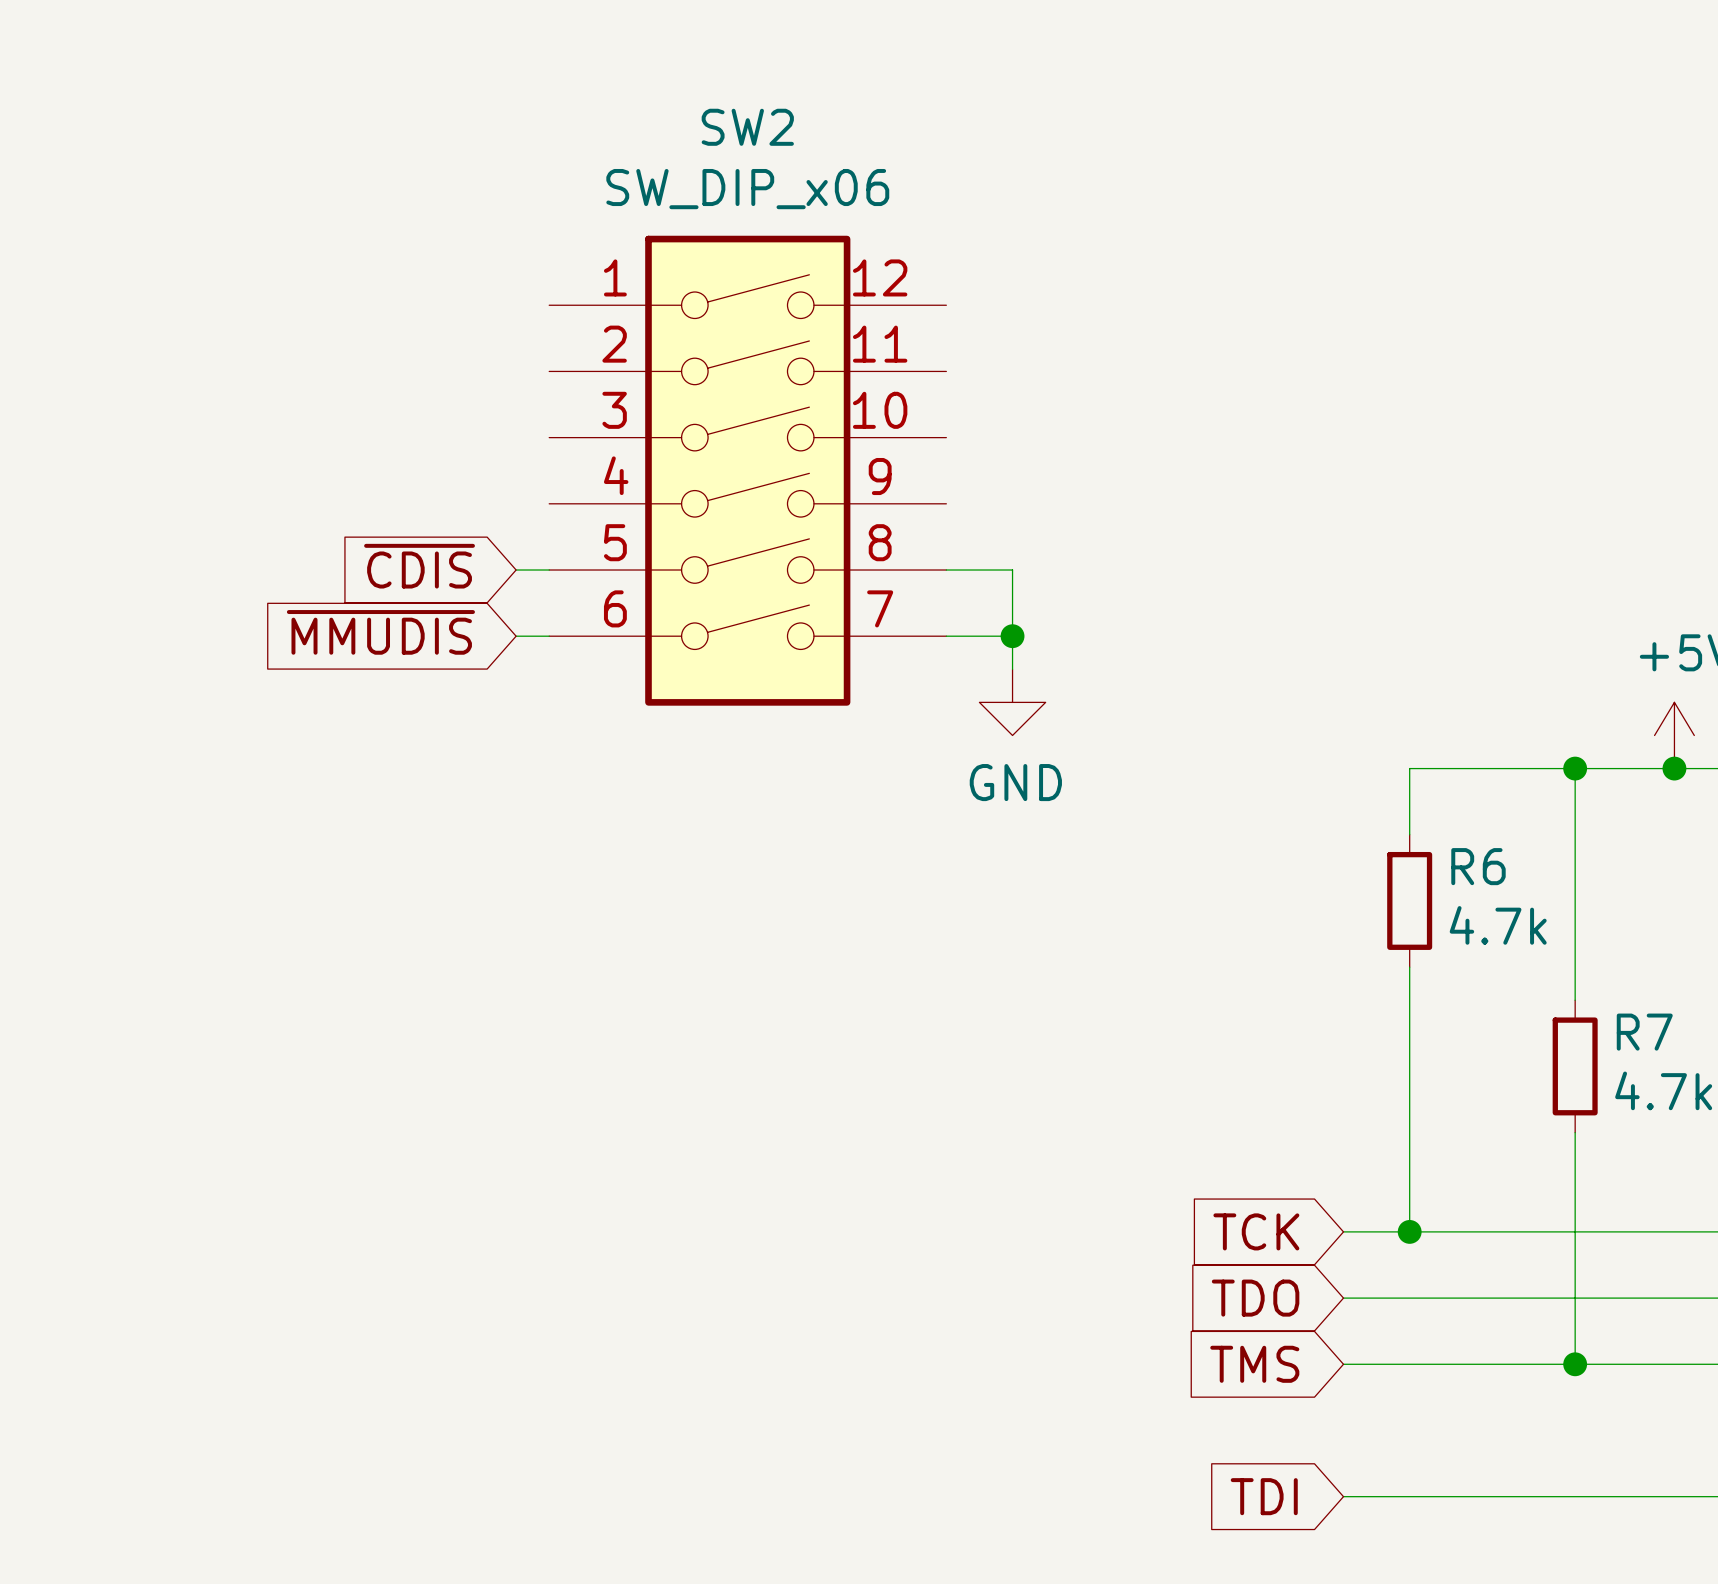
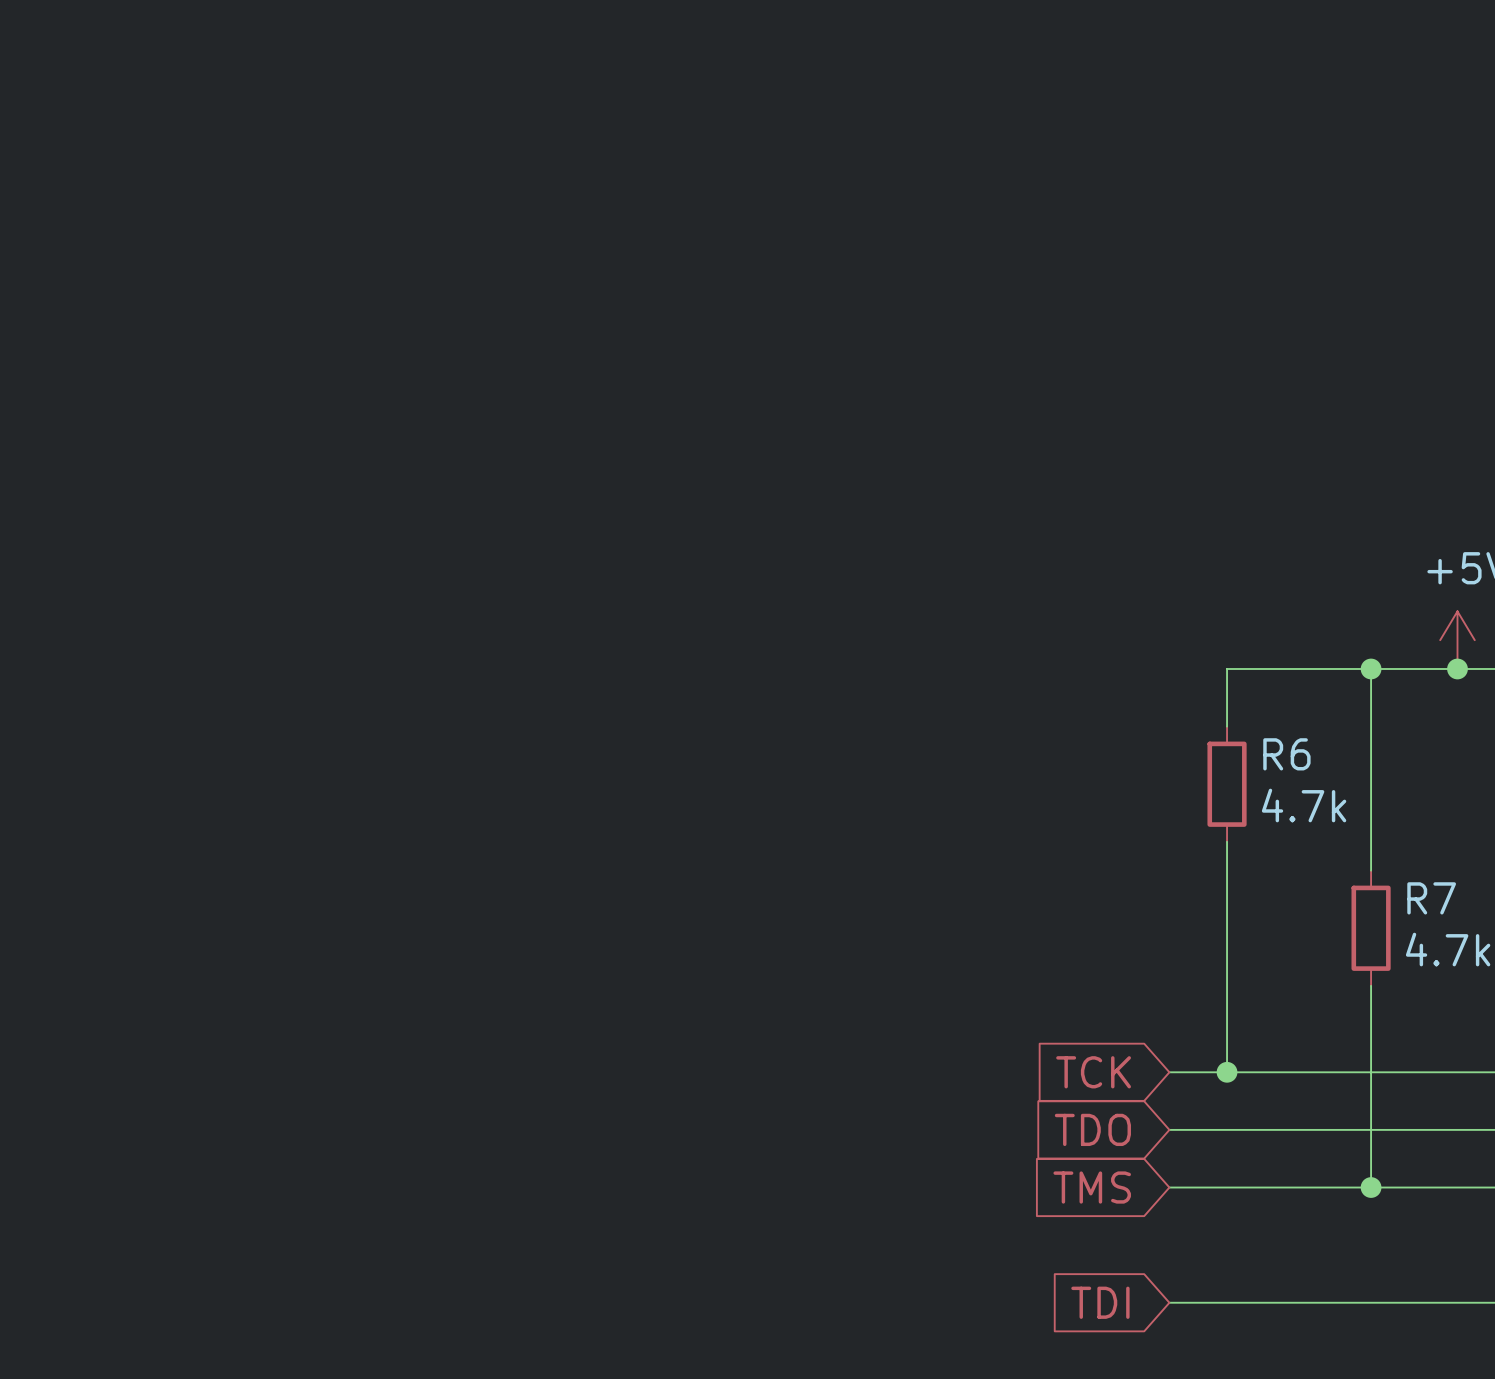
SW2: SW_DIP_x06 (747, 470) -> none
global label: ~{CDIS} (419, 566) -> none
wire: (516, 570) (549, 570) -> none
wire: (946, 570) (1012, 570) (1012, 669) -> none
global label: ~{MMUDIS} (380, 632) -> none
wire: (516, 636) (549, 636) -> none
wire: (946, 636) (1012, 636) -> none
junction: (1012, 636) -> none
power symbol: GND (1012, 702) -> none

